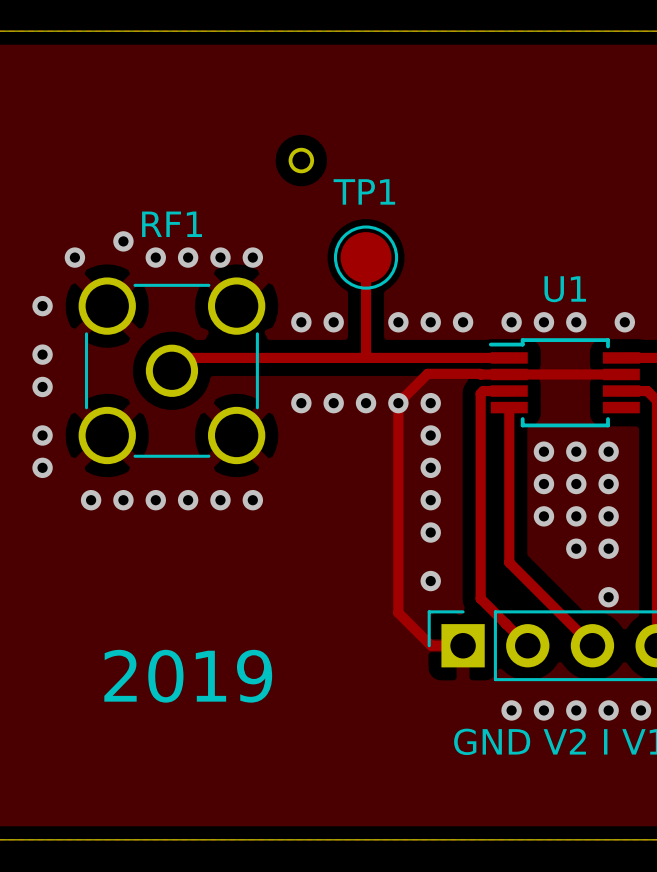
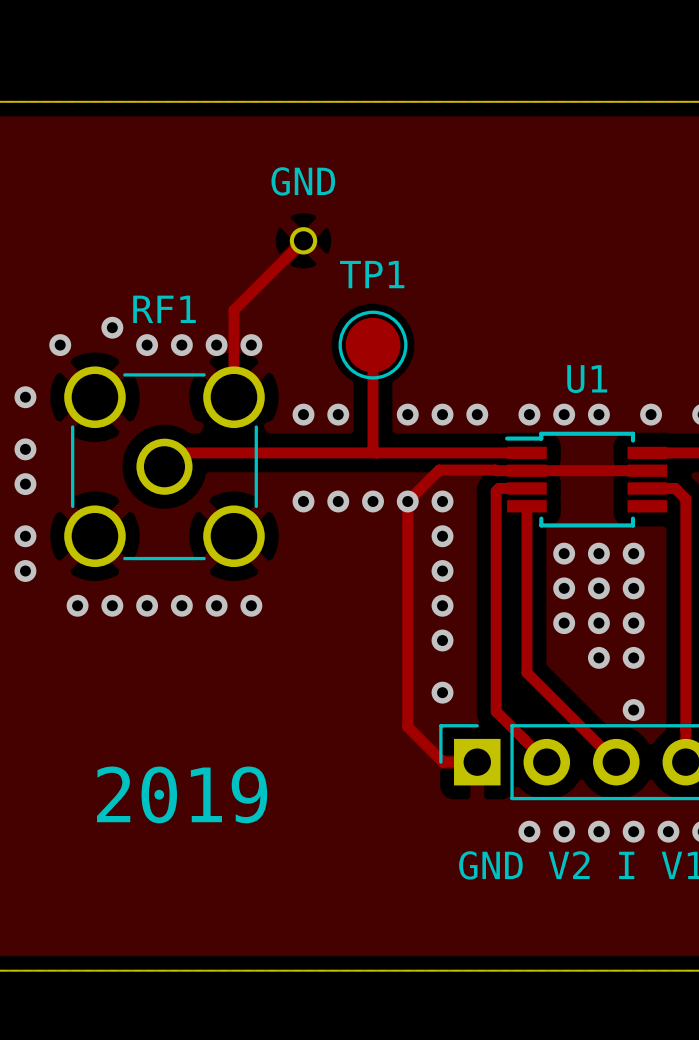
GND name: none -> GND (303, 181)
track: none -> (303, 240) (233, 310) (233, 397)

